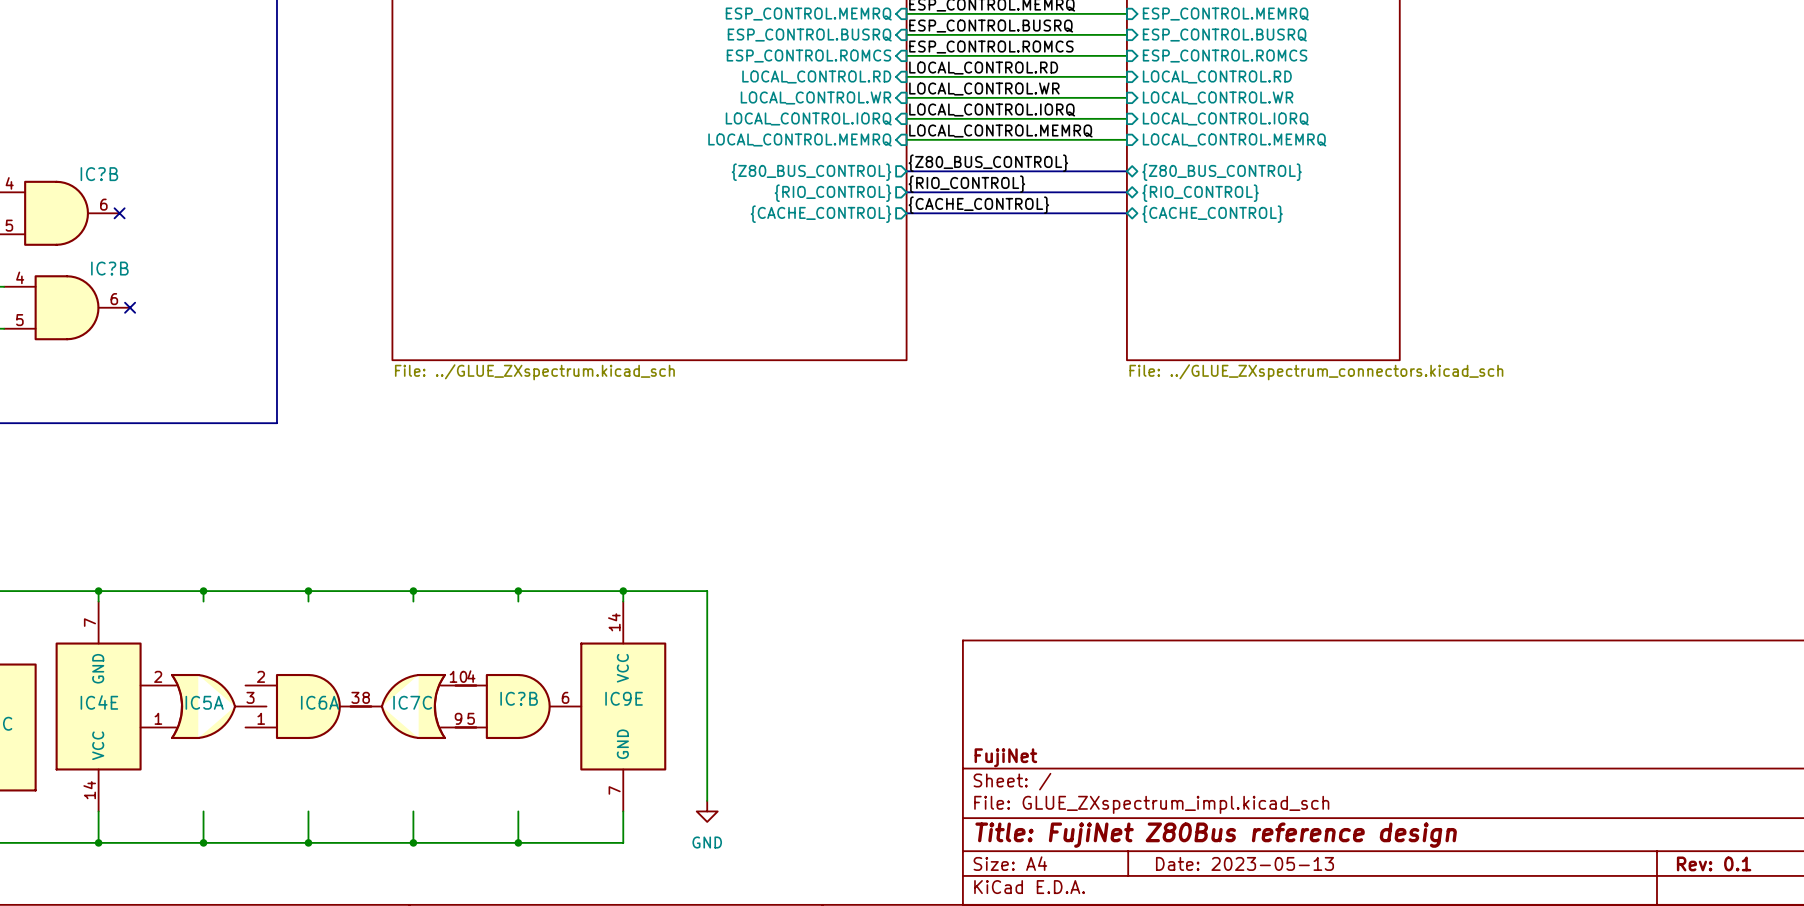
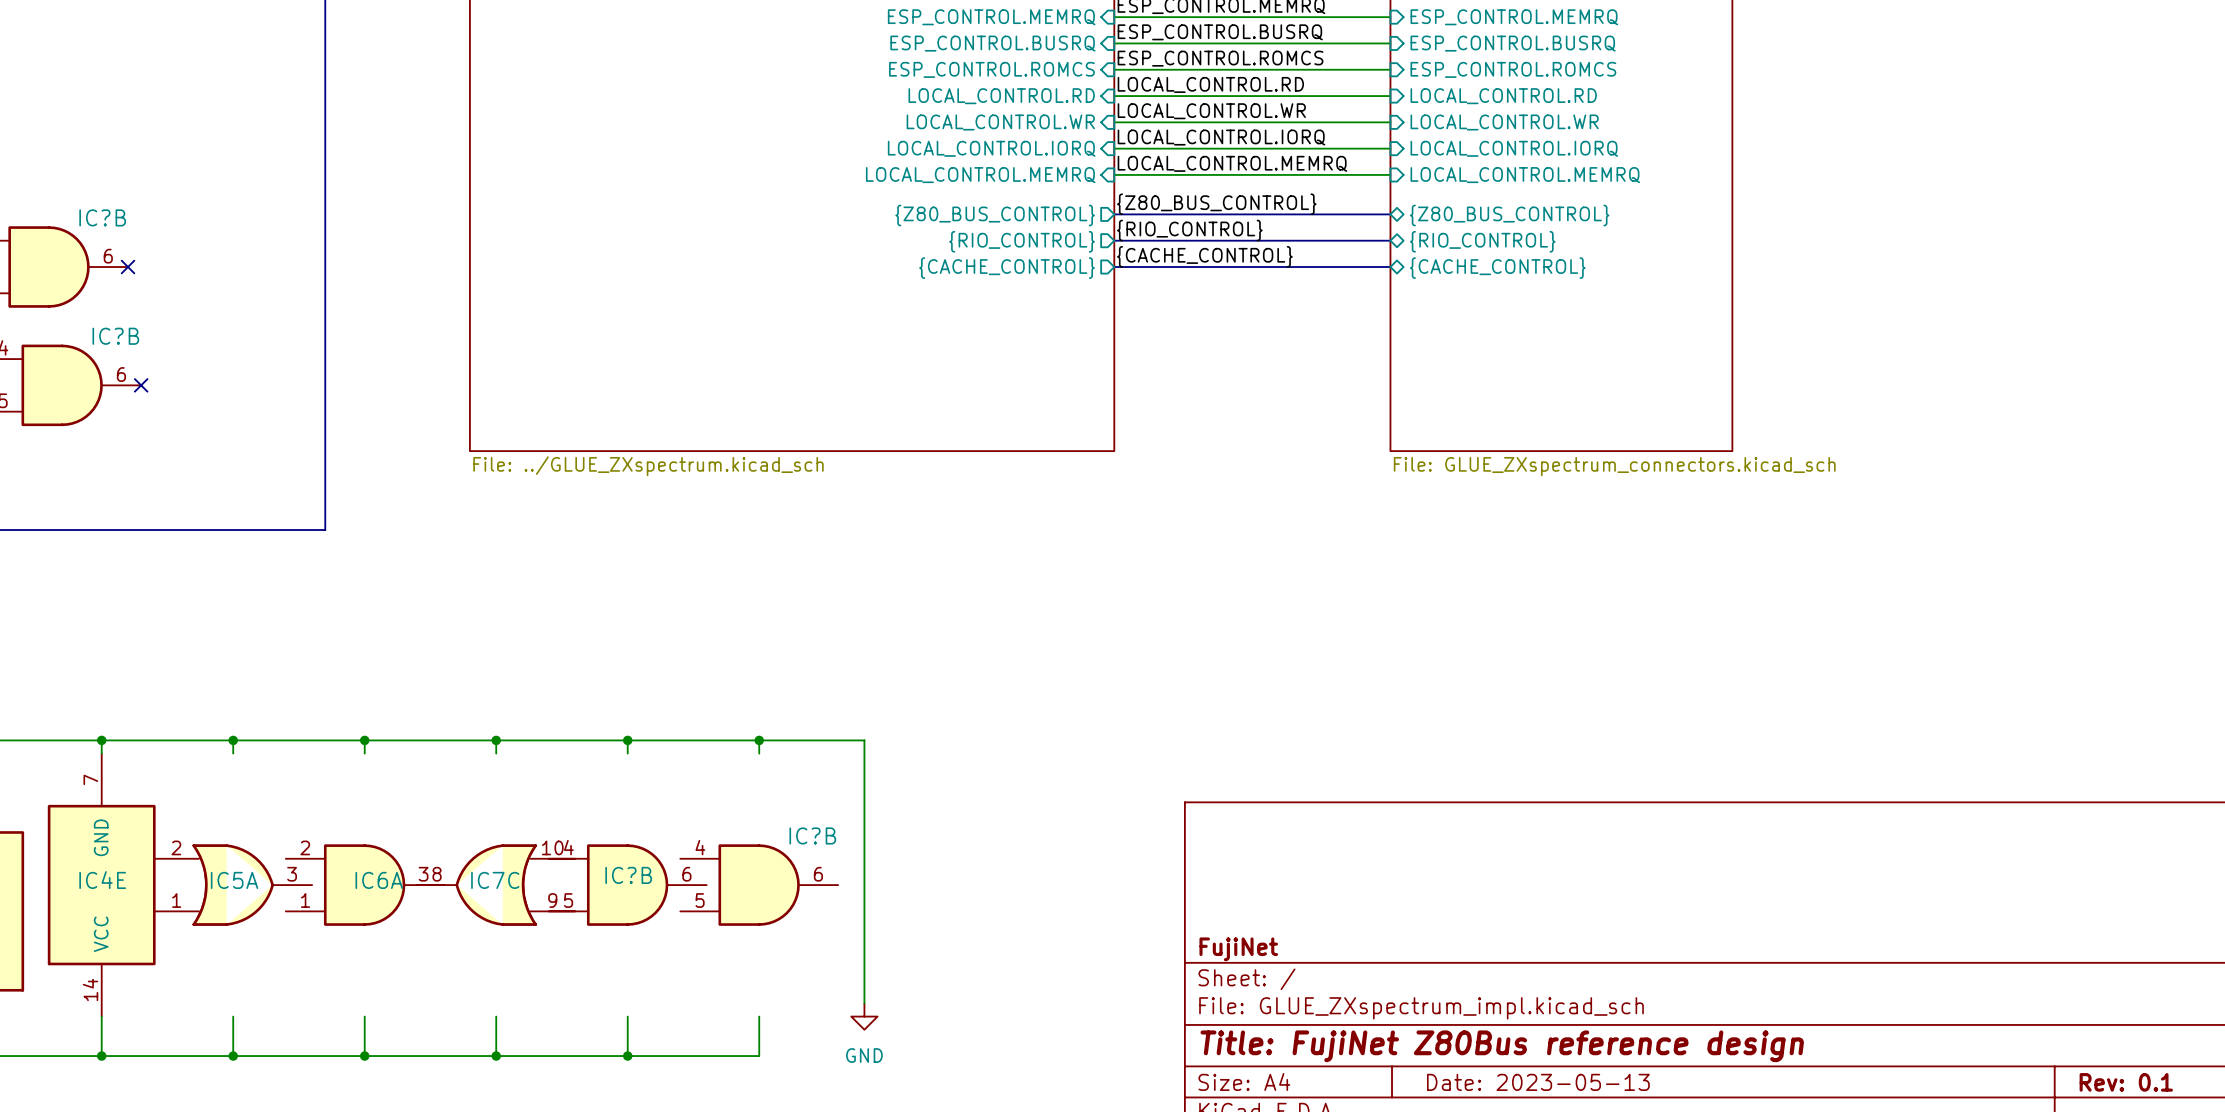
sheet value: File: ../GLUE_ZXspectrum_connectors.kicad_sch (1316, 372) -> File: GLUE_ZXspectrum_connectors.kicad_sch (1614, 466)
IC9E: (623, 706) -> none
IC?B: none -> (759, 885)

